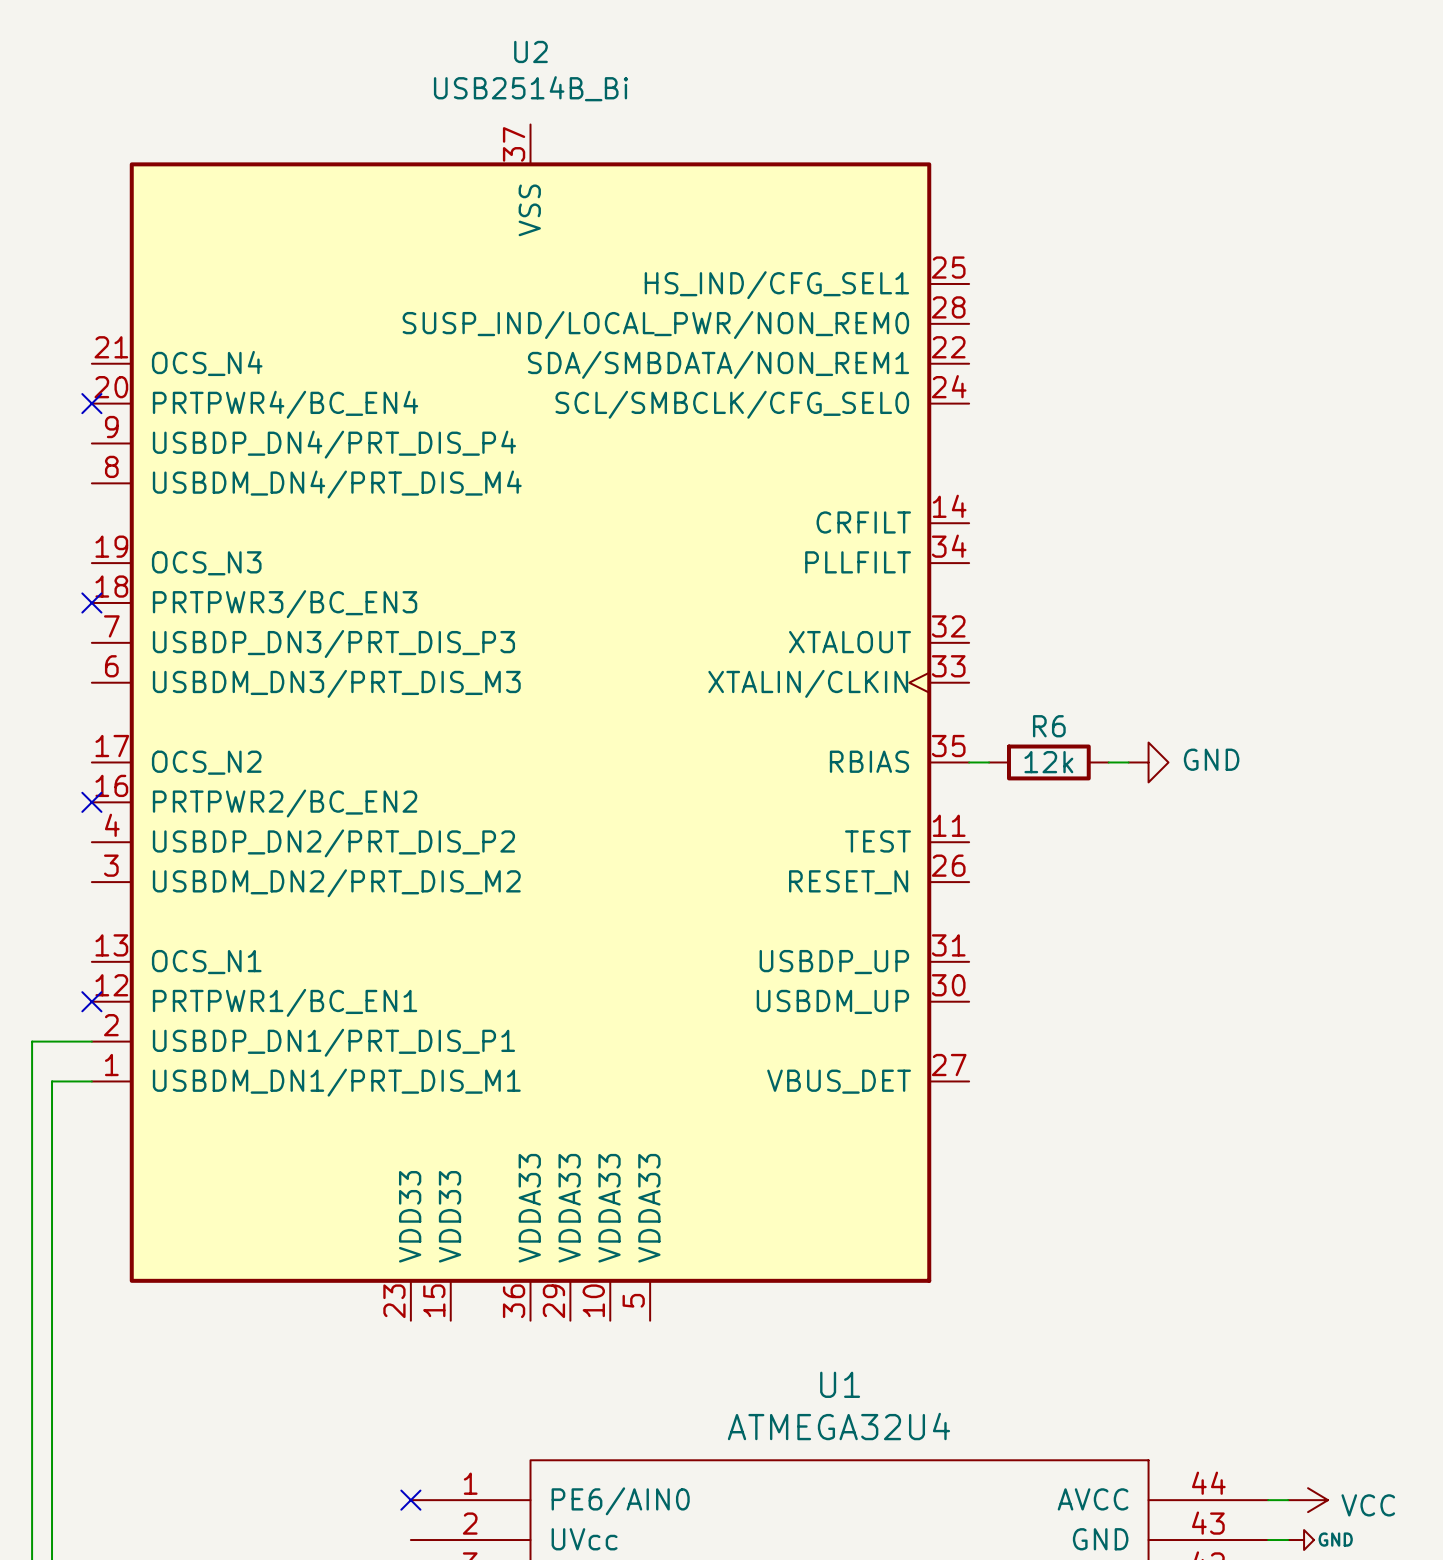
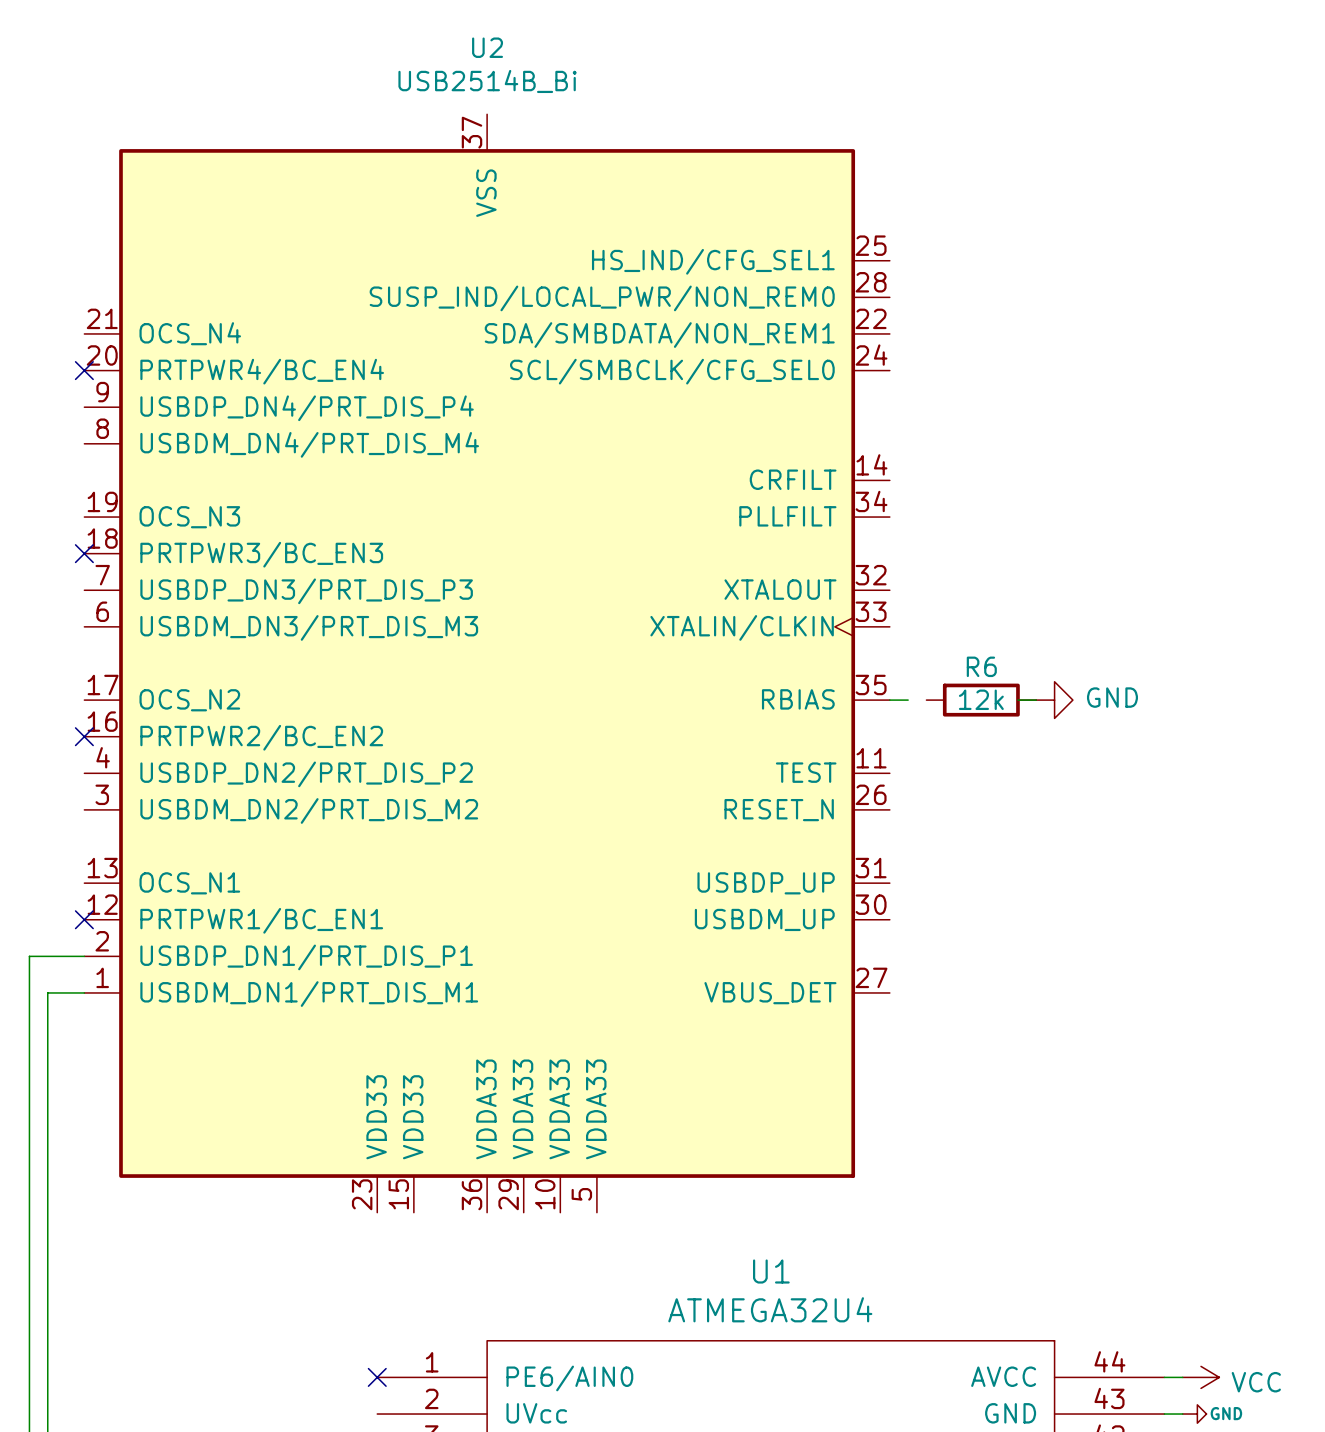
R6 position: (1048, 762) -> (981, 700)

